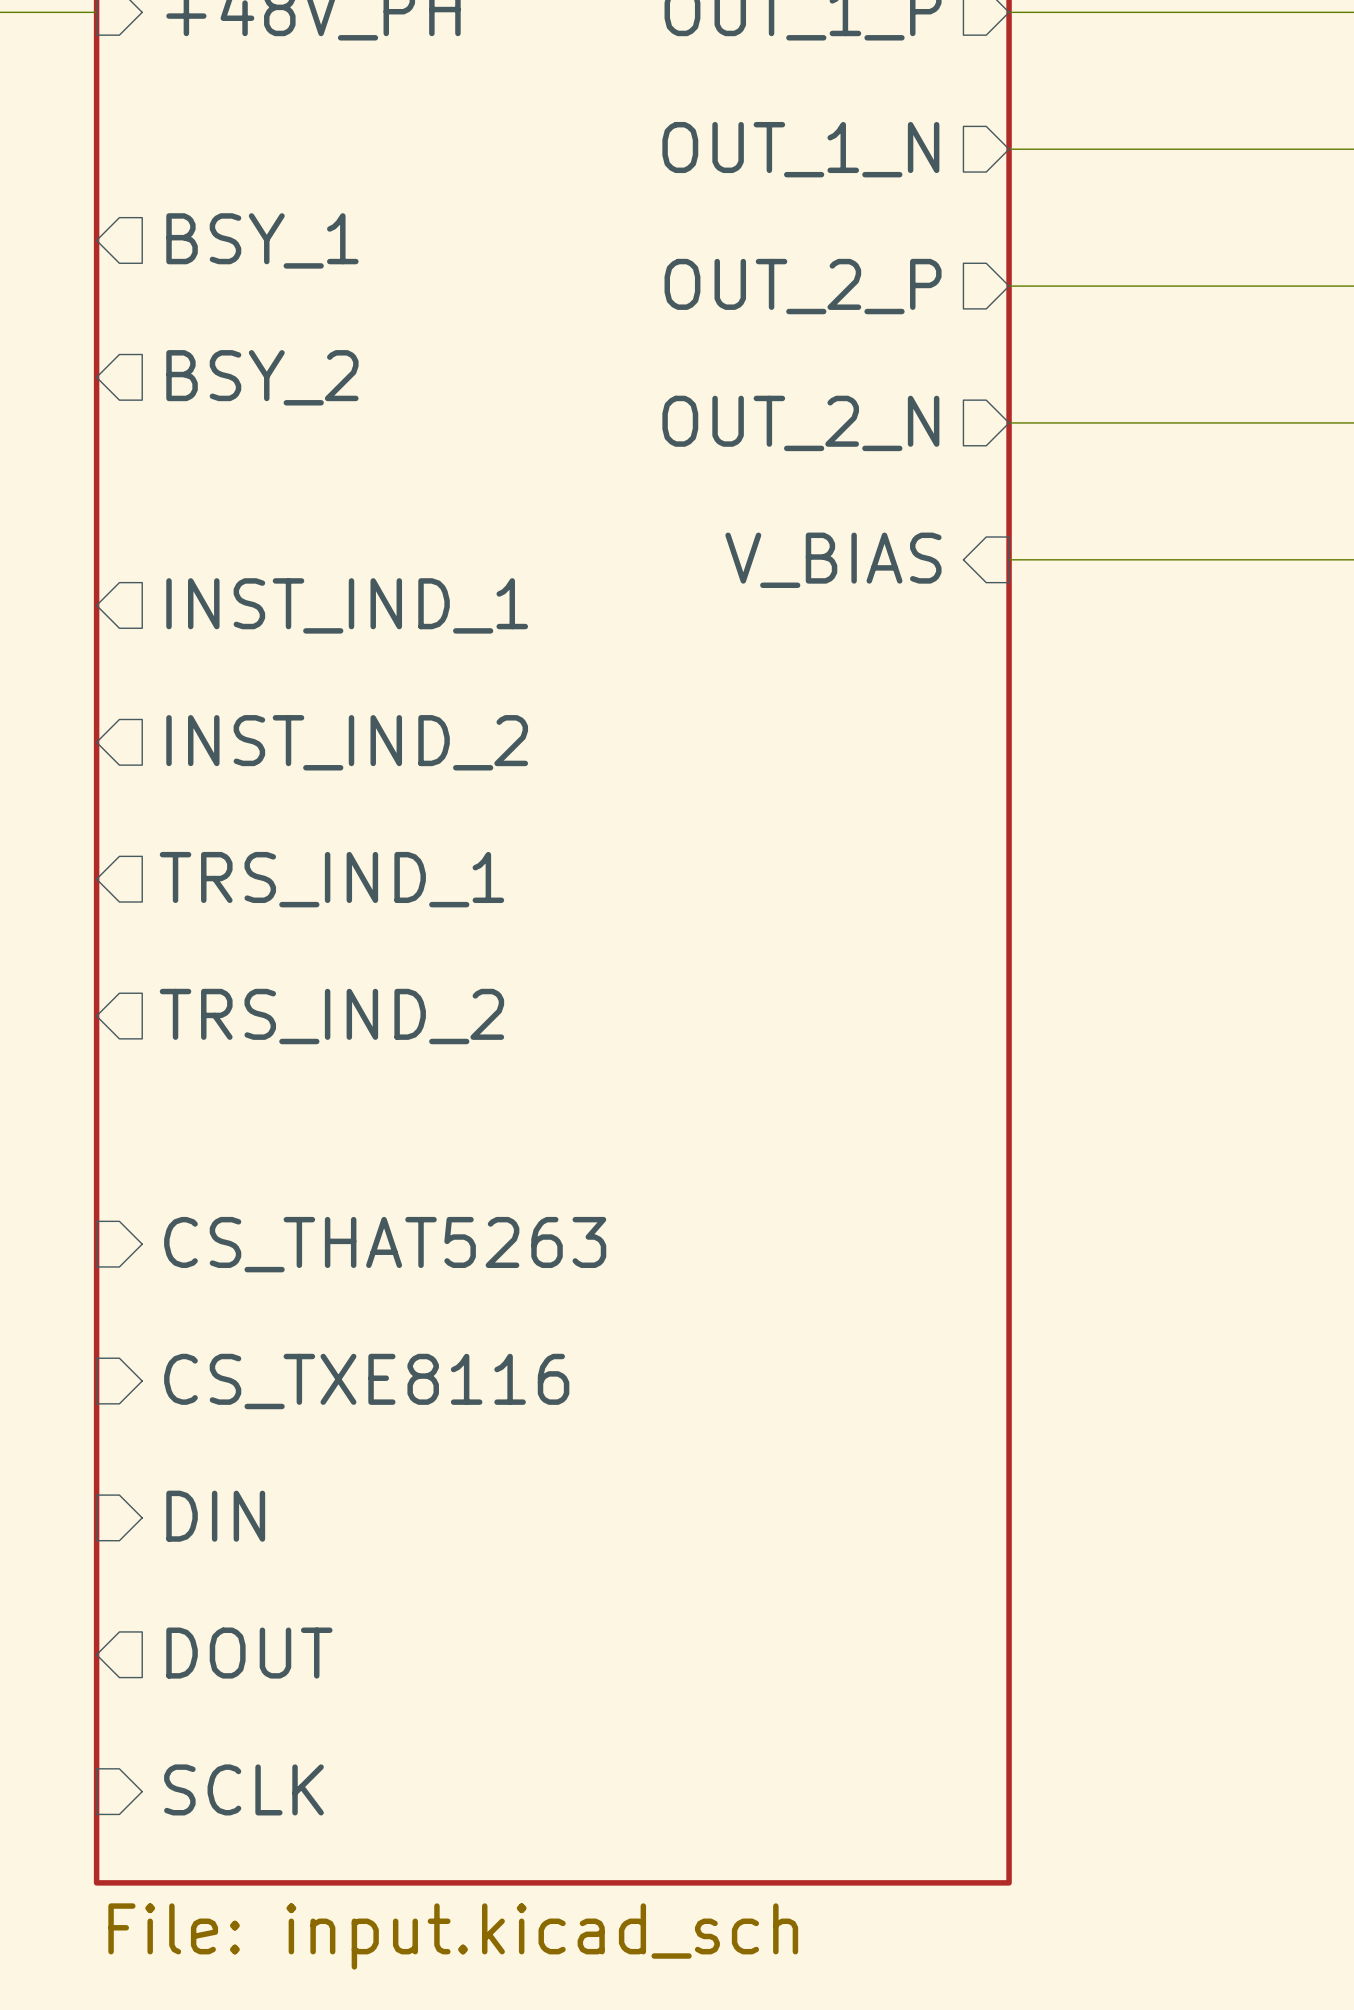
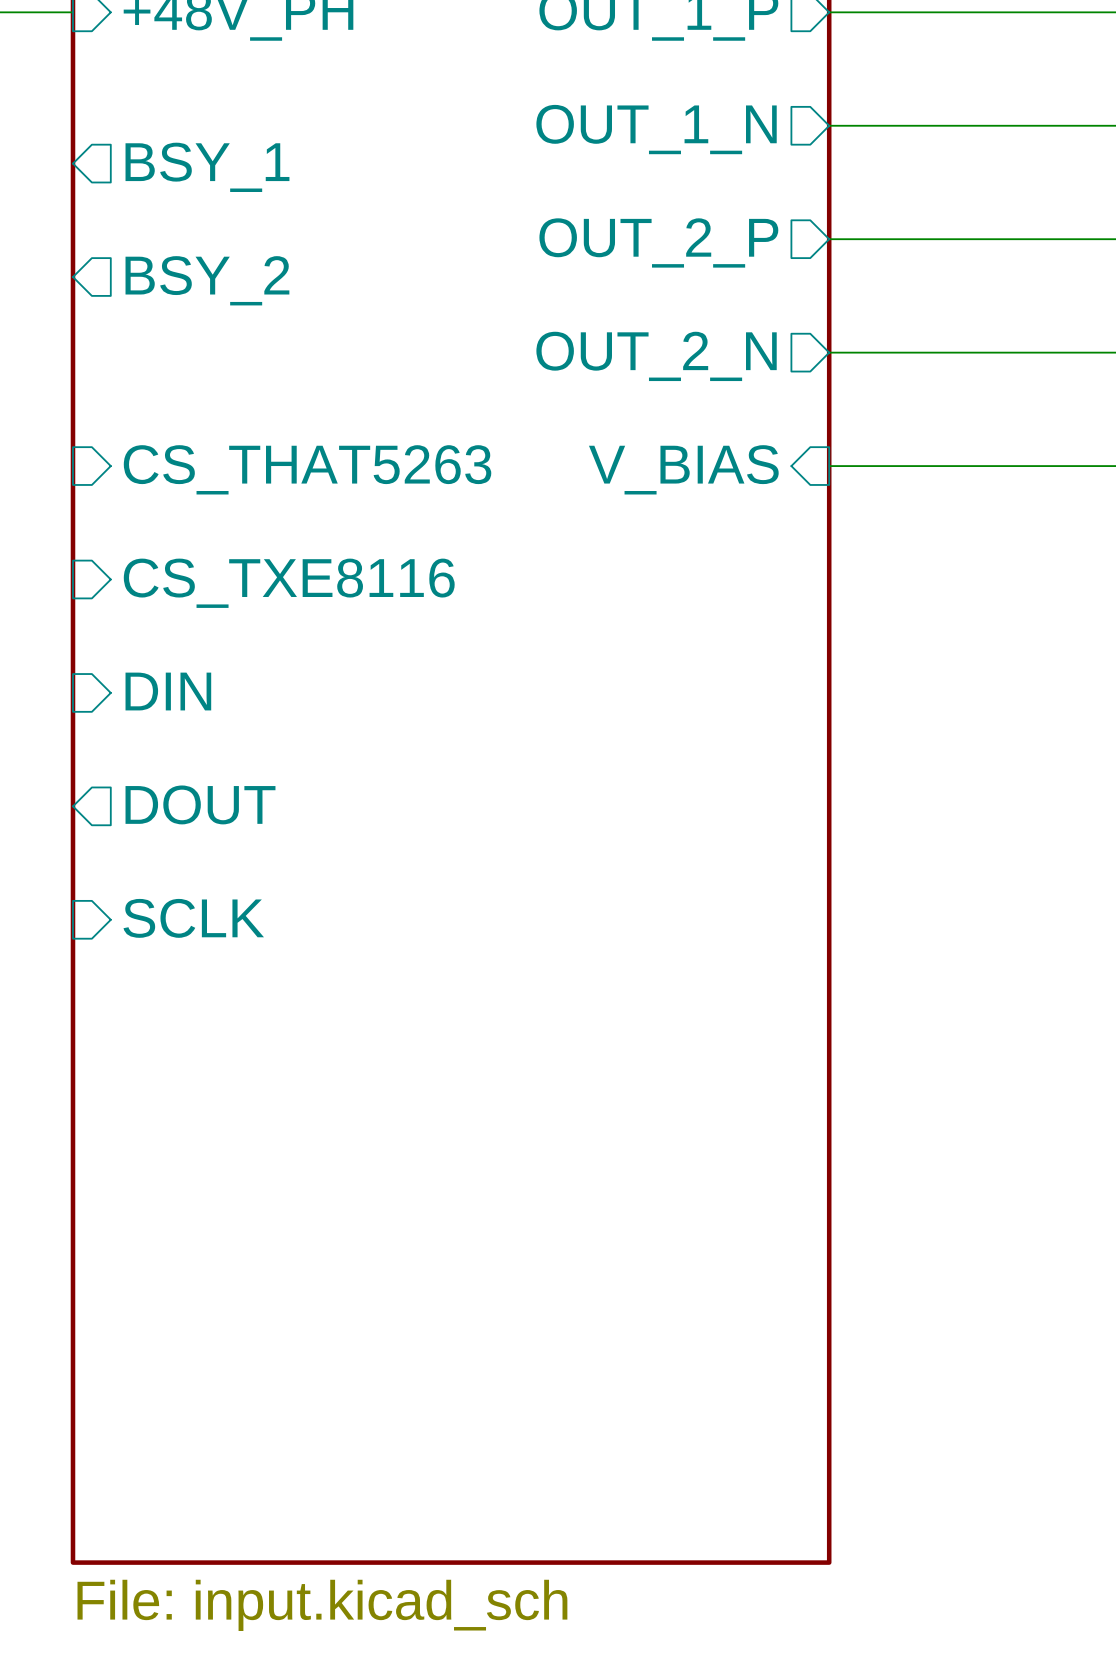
sheet pin position: BSY_1 (262, 240) -> BSY_1 (207, 167)
sheet pin position: BSY_2 (262, 377) -> BSY_2 (207, 280)
sheet pin: INST_IND_1 (347, 605) -> none
sheet pin: INST_IND_2 (347, 742) -> none
sheet pin: TRS_IND_1 (331, 879) -> none
sheet pin: TRS_IND_2 (331, 1016) -> none
sheet pin position: CS_THAT5263 (385, 1244) -> CS_THAT5263 (307, 469)
sheet pin position: CS_TXE8116 (366, 1381) -> CS_TXE8116 (289, 583)
sheet pin position: DIN (215, 1516) -> DIN (168, 691)
sheet pin position: DOUT (249, 1653) -> DOUT (200, 804)
sheet pin position: SCLK (243, 1789) -> SCLK (193, 918)

